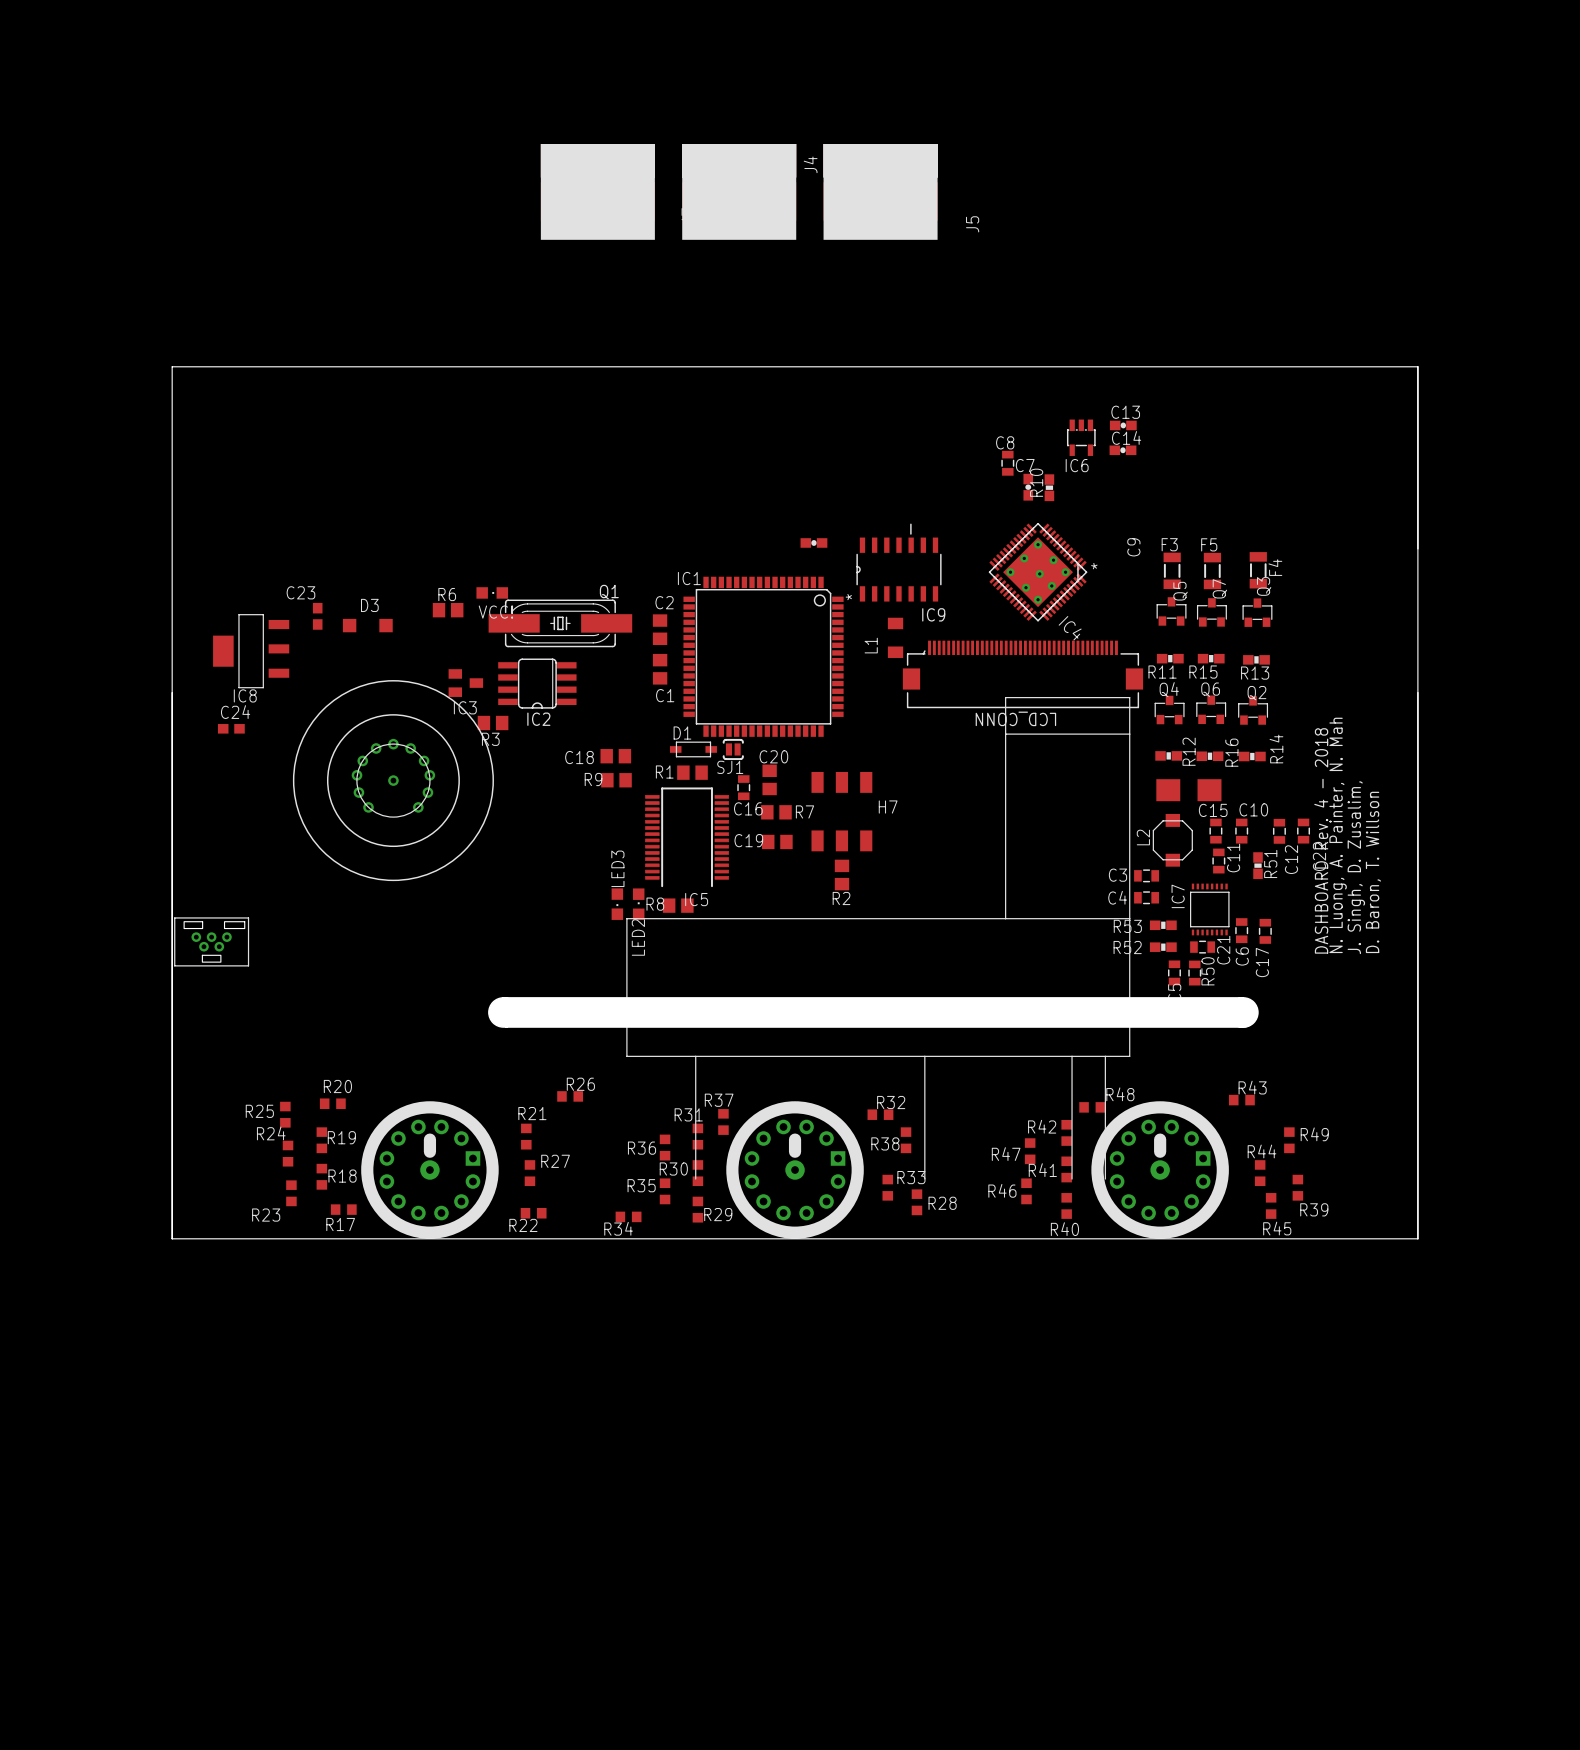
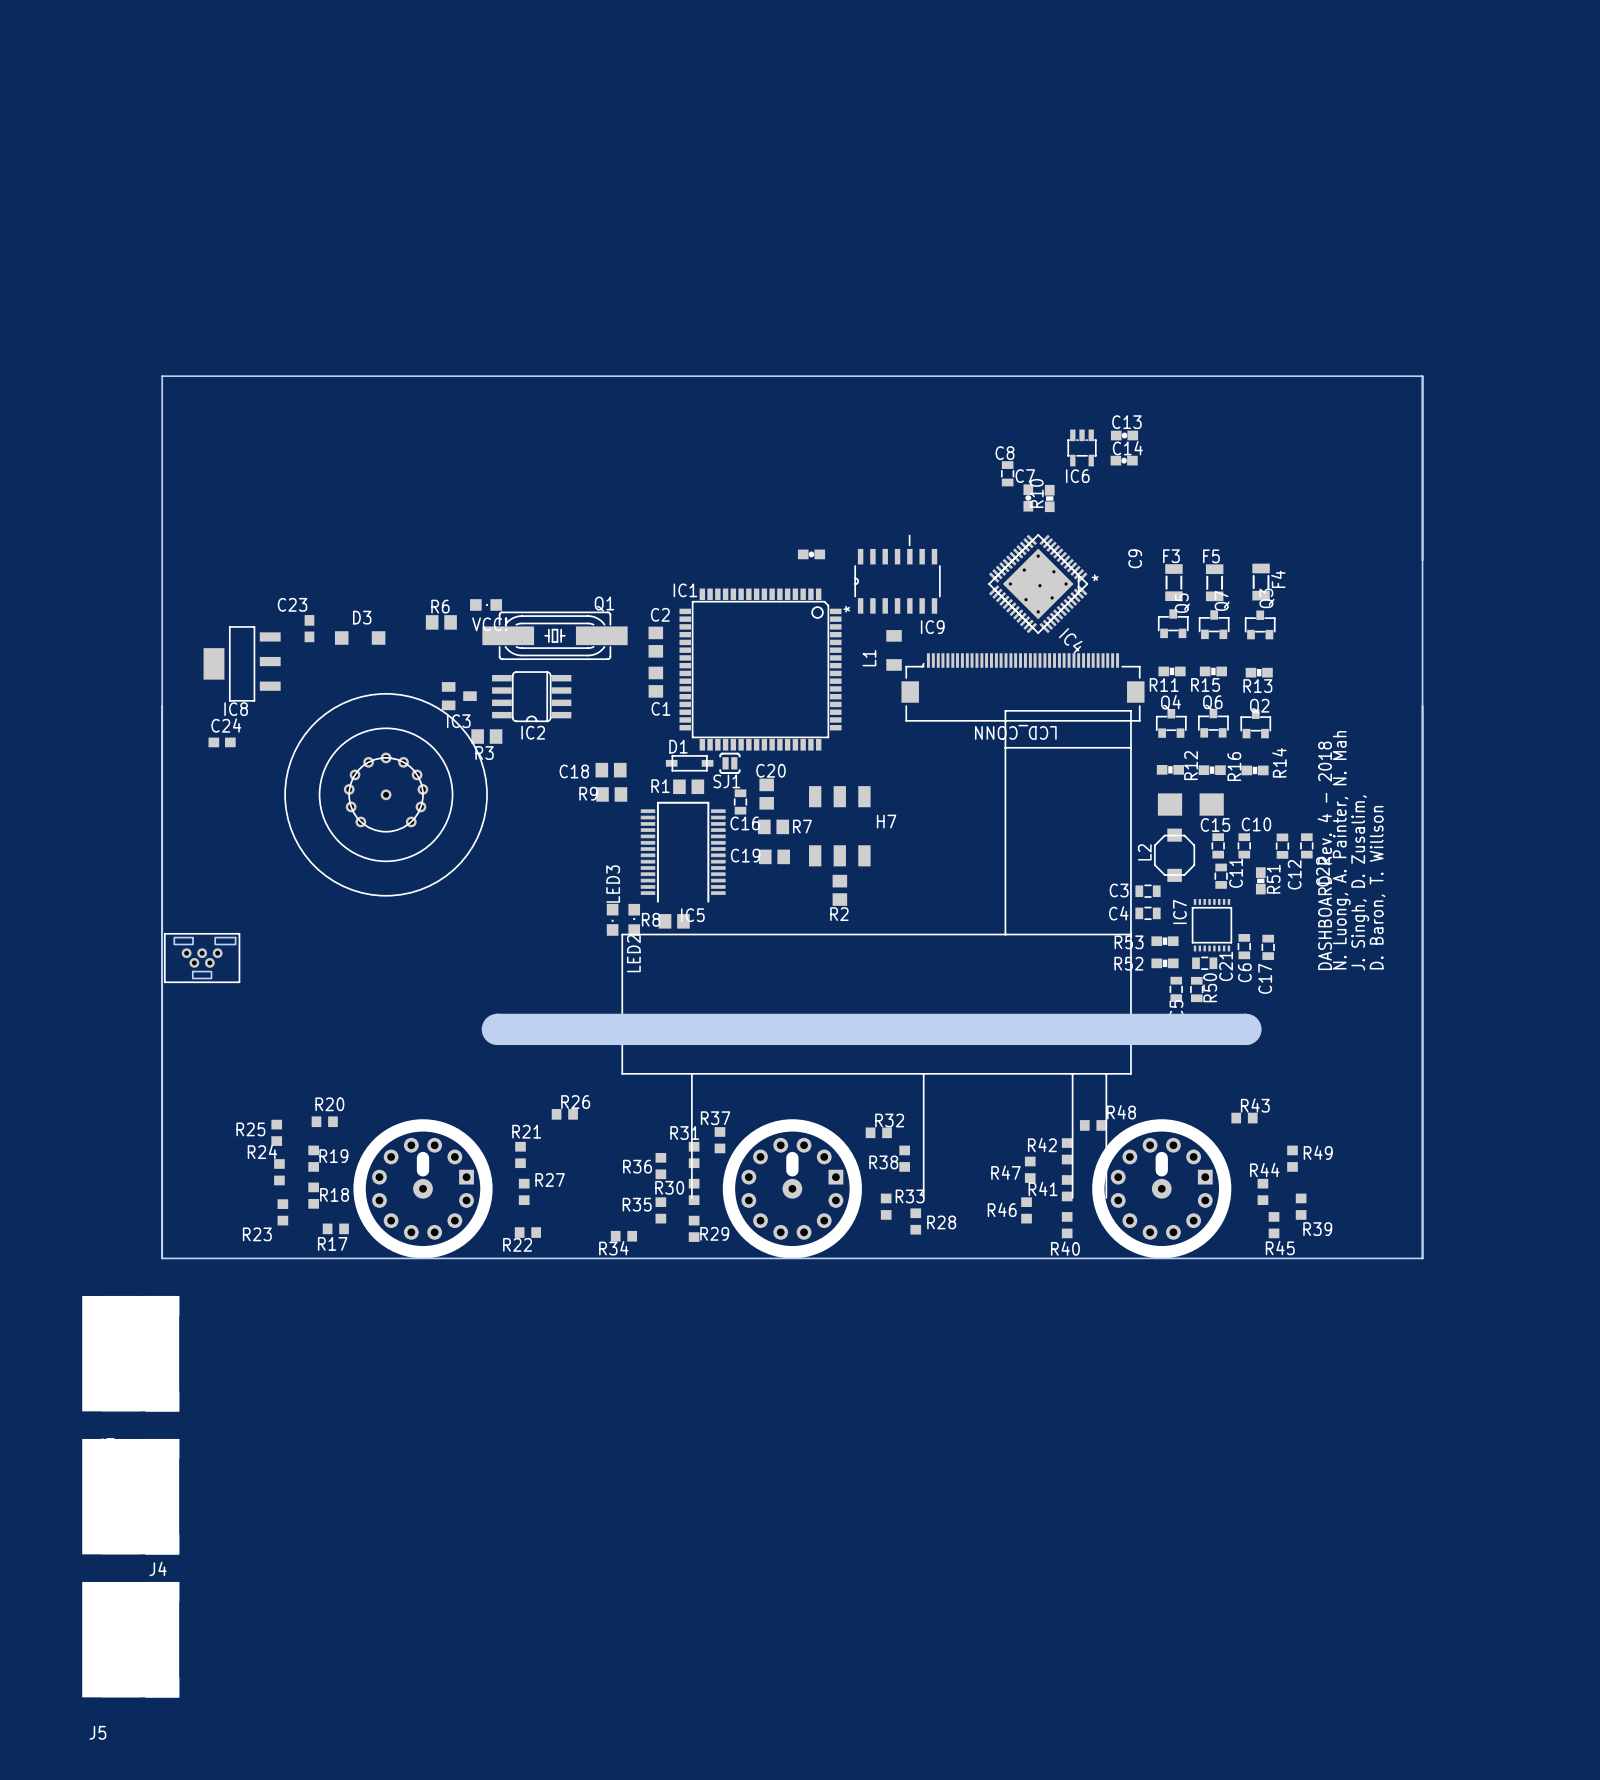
part rotation: 0° (597, 191) -> 90° clockwise (130, 1353)
part position: (597, 191) -> (130, 1353)
J4 rotation: 0° (739, 191) -> 90° clockwise (130, 1496)
J4 position: (739, 191) -> (130, 1496)
J5 rotation: 0° (880, 191) -> 90° clockwise (130, 1639)
J5 position: (880, 191) -> (130, 1639)

